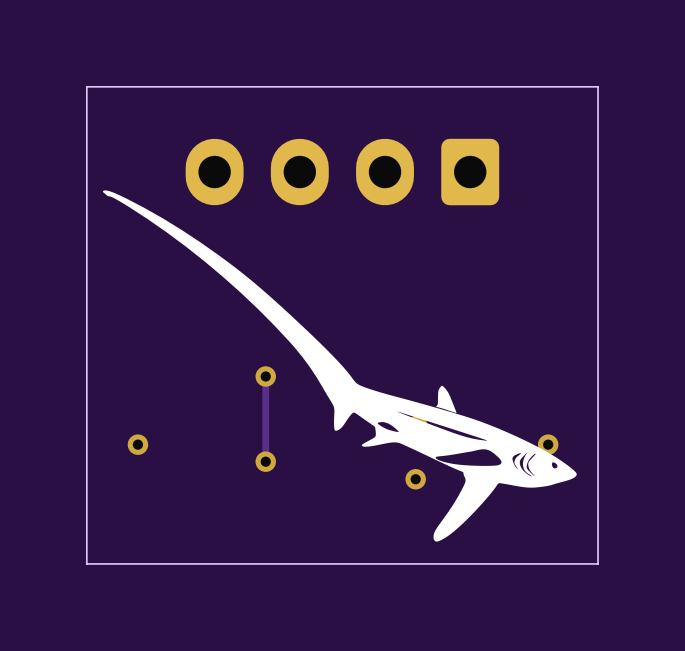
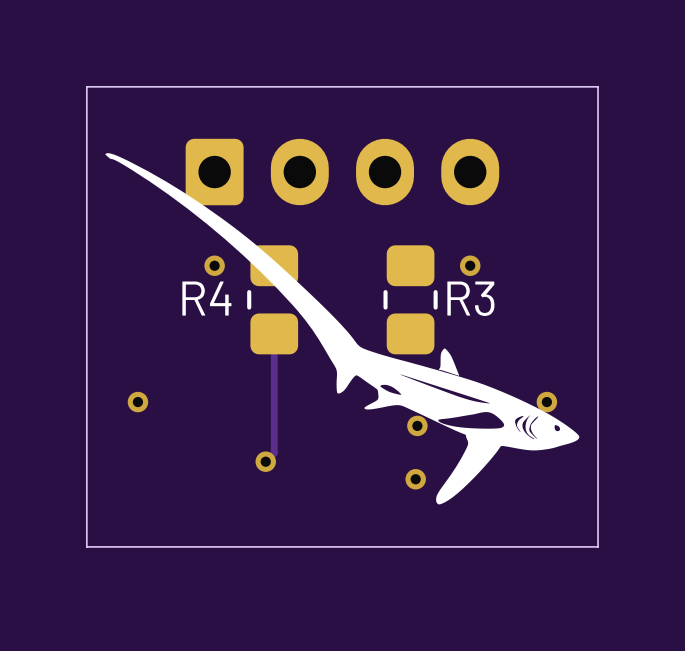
part rotation: 0° (342, 172) -> 180° (342, 172)
via: none -> (214, 265)
via: none -> (470, 265)
R4: none -> (274, 299)
R3: none -> (410, 299)
drawing position: (339, 366) -> (342, 328)
track: (265, 376) (265, 461) -> (274, 333) (274, 453) (265, 461)
via: (265, 376) -> none
via position: (137, 444) -> (137, 402)
via position: (548, 444) -> (546, 402)
board edge: (598, 546) (598, 563) (86, 563) (86, 546) -> (598, 546) (86, 546)

